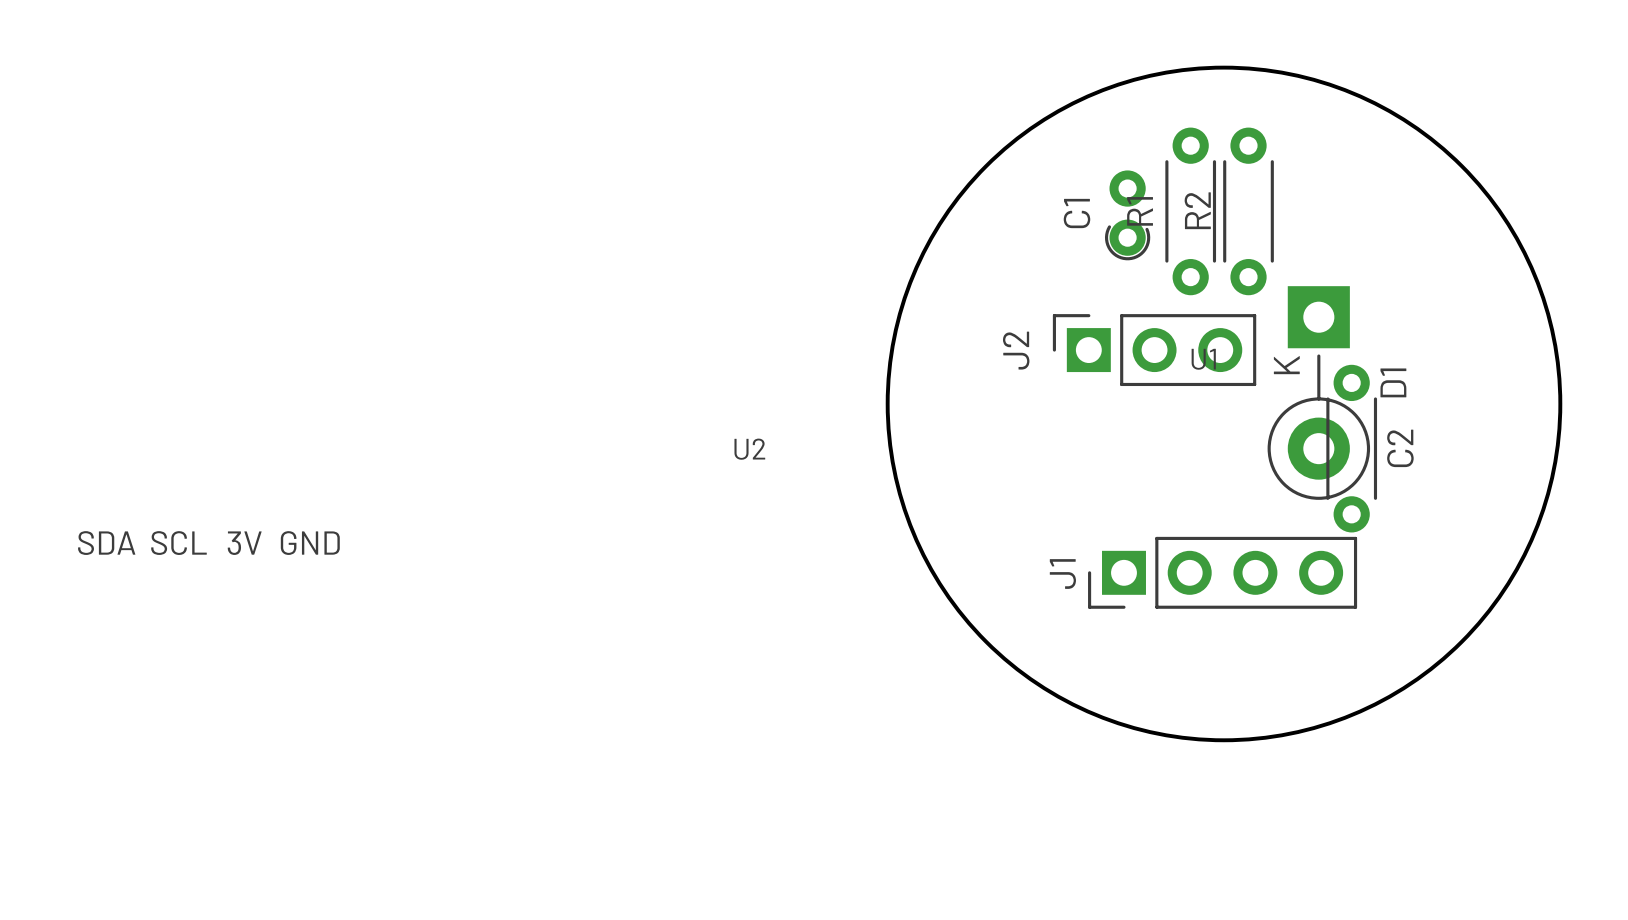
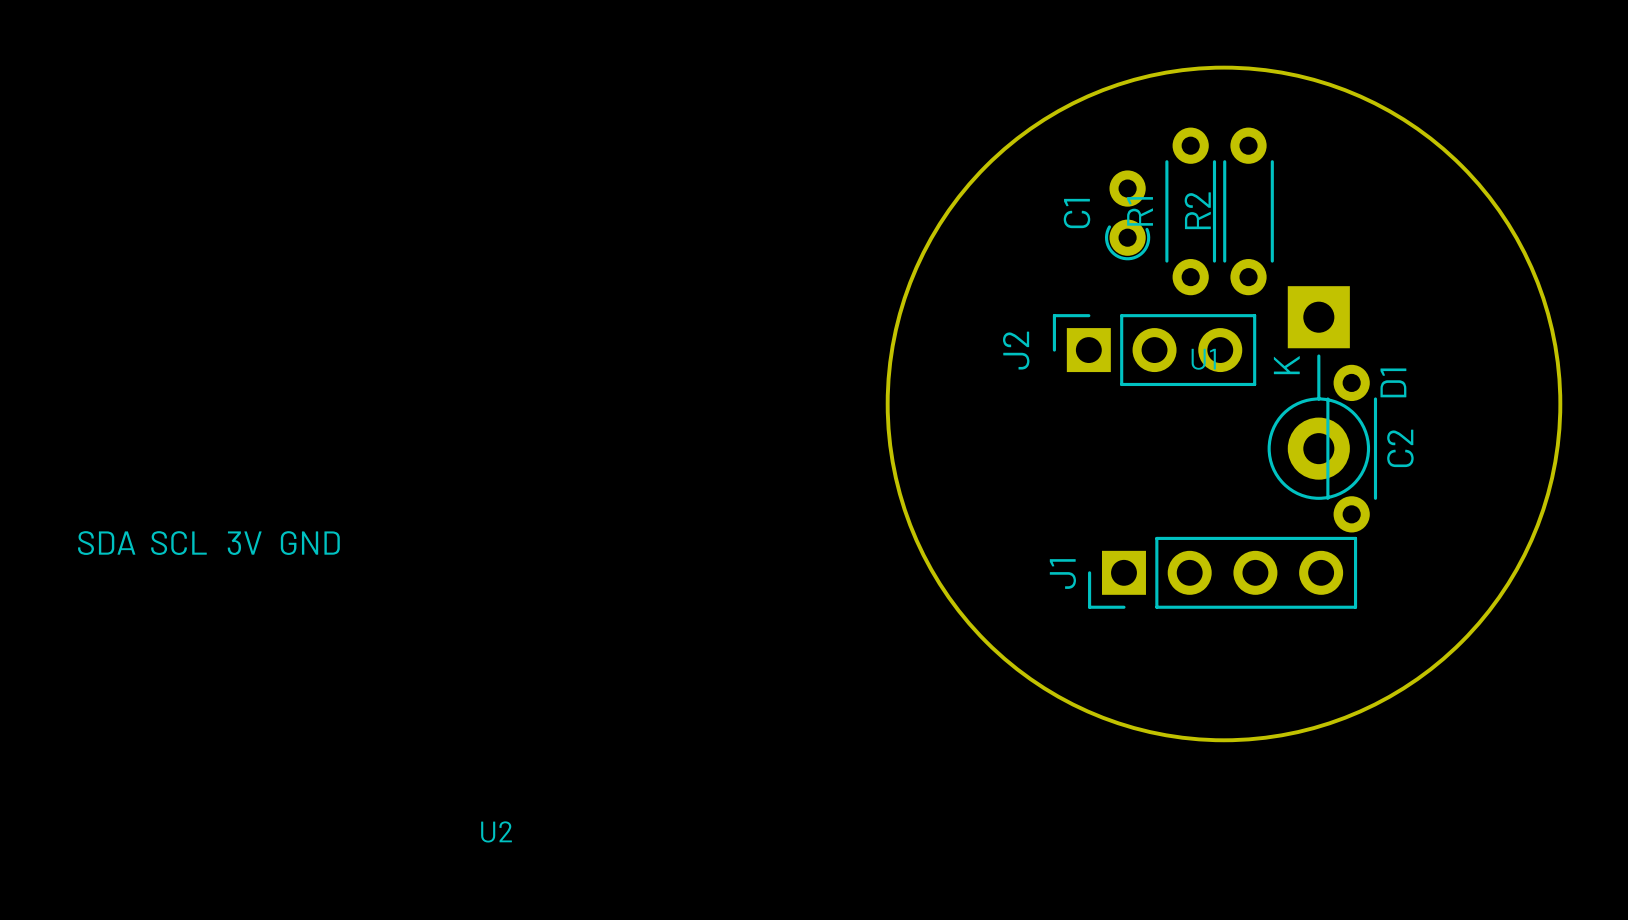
text position: U2 (749, 449) -> U2 (496, 831)

